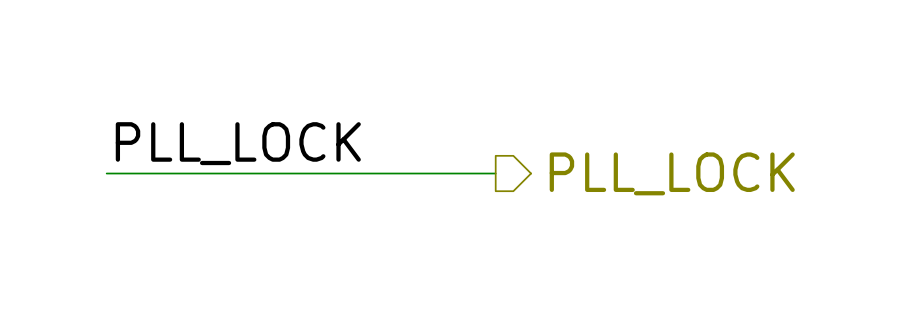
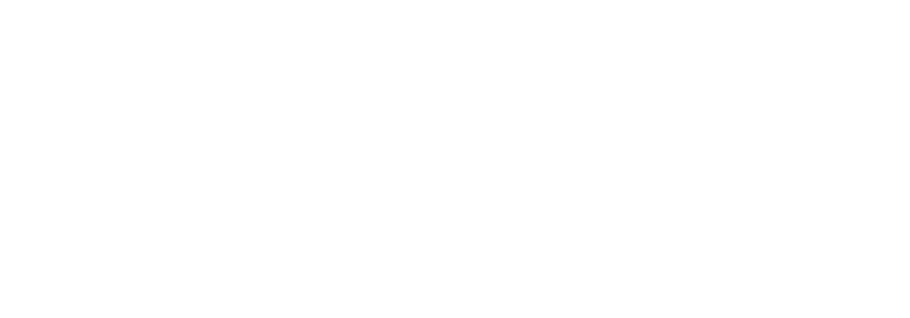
label: PLL_LOCK (238, 143) -> none
wire: (106, 173) (495, 173) -> none
hierarchical label: PLL_LOCK (672, 173) -> none

